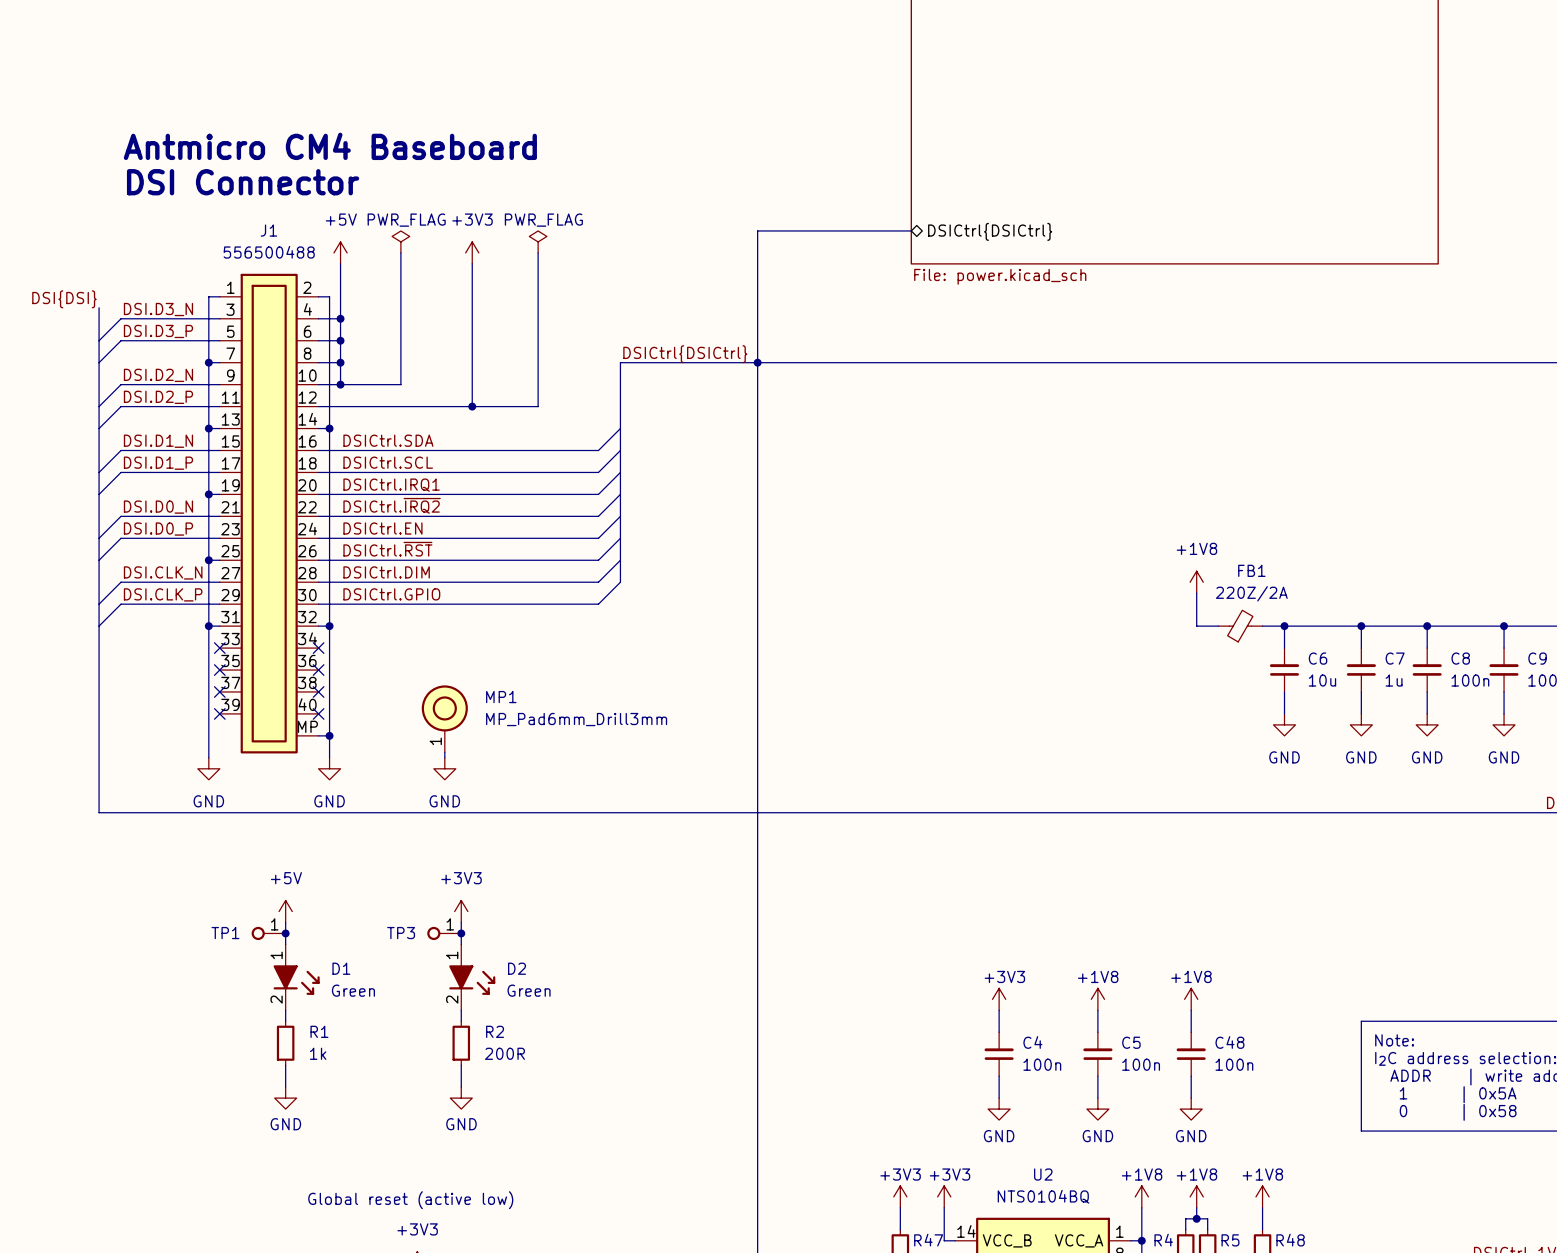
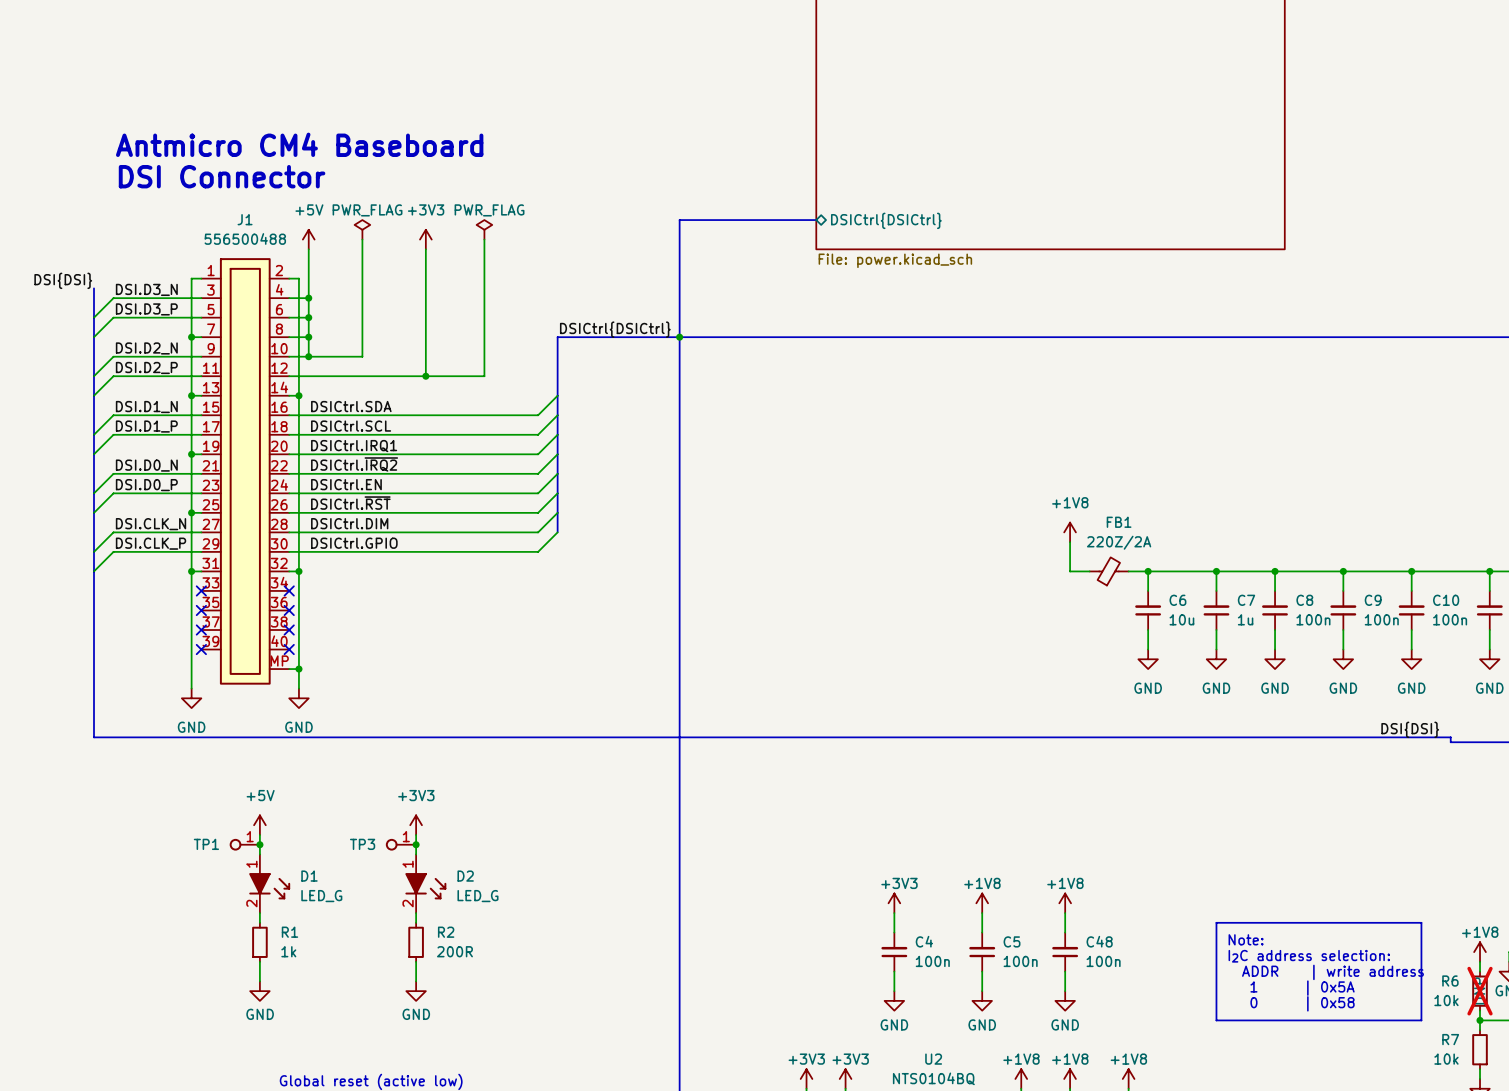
MP1: MP_Pad6mm_Drill3mm (444, 718) -> none
wire: (444, 752) (444, 757) -> none
power symbol: GND (444, 768) -> none
D1 text: Green (353, 990) -> none
D2 text: Green (529, 990) -> none
D1 value: none -> LED_G (321, 896)
D2 value: none -> LED_G (477, 896)

